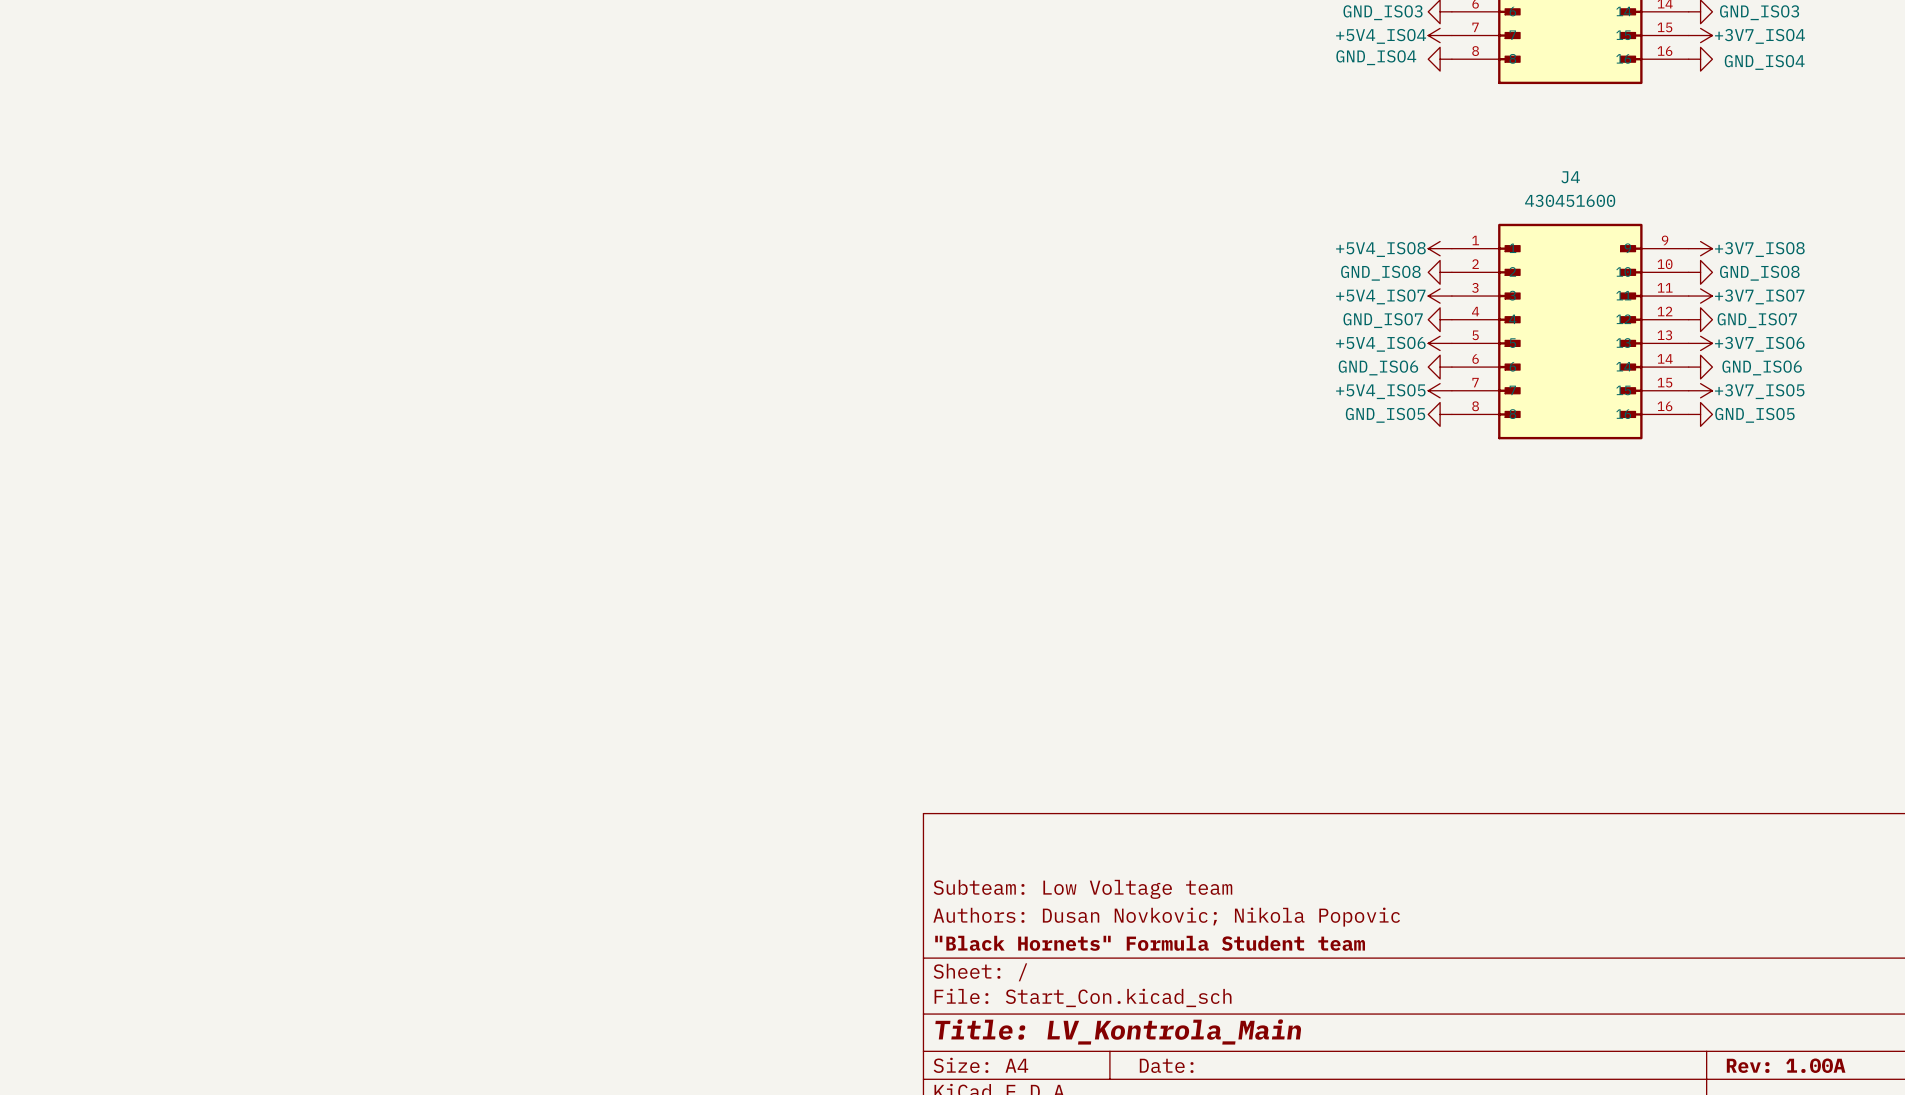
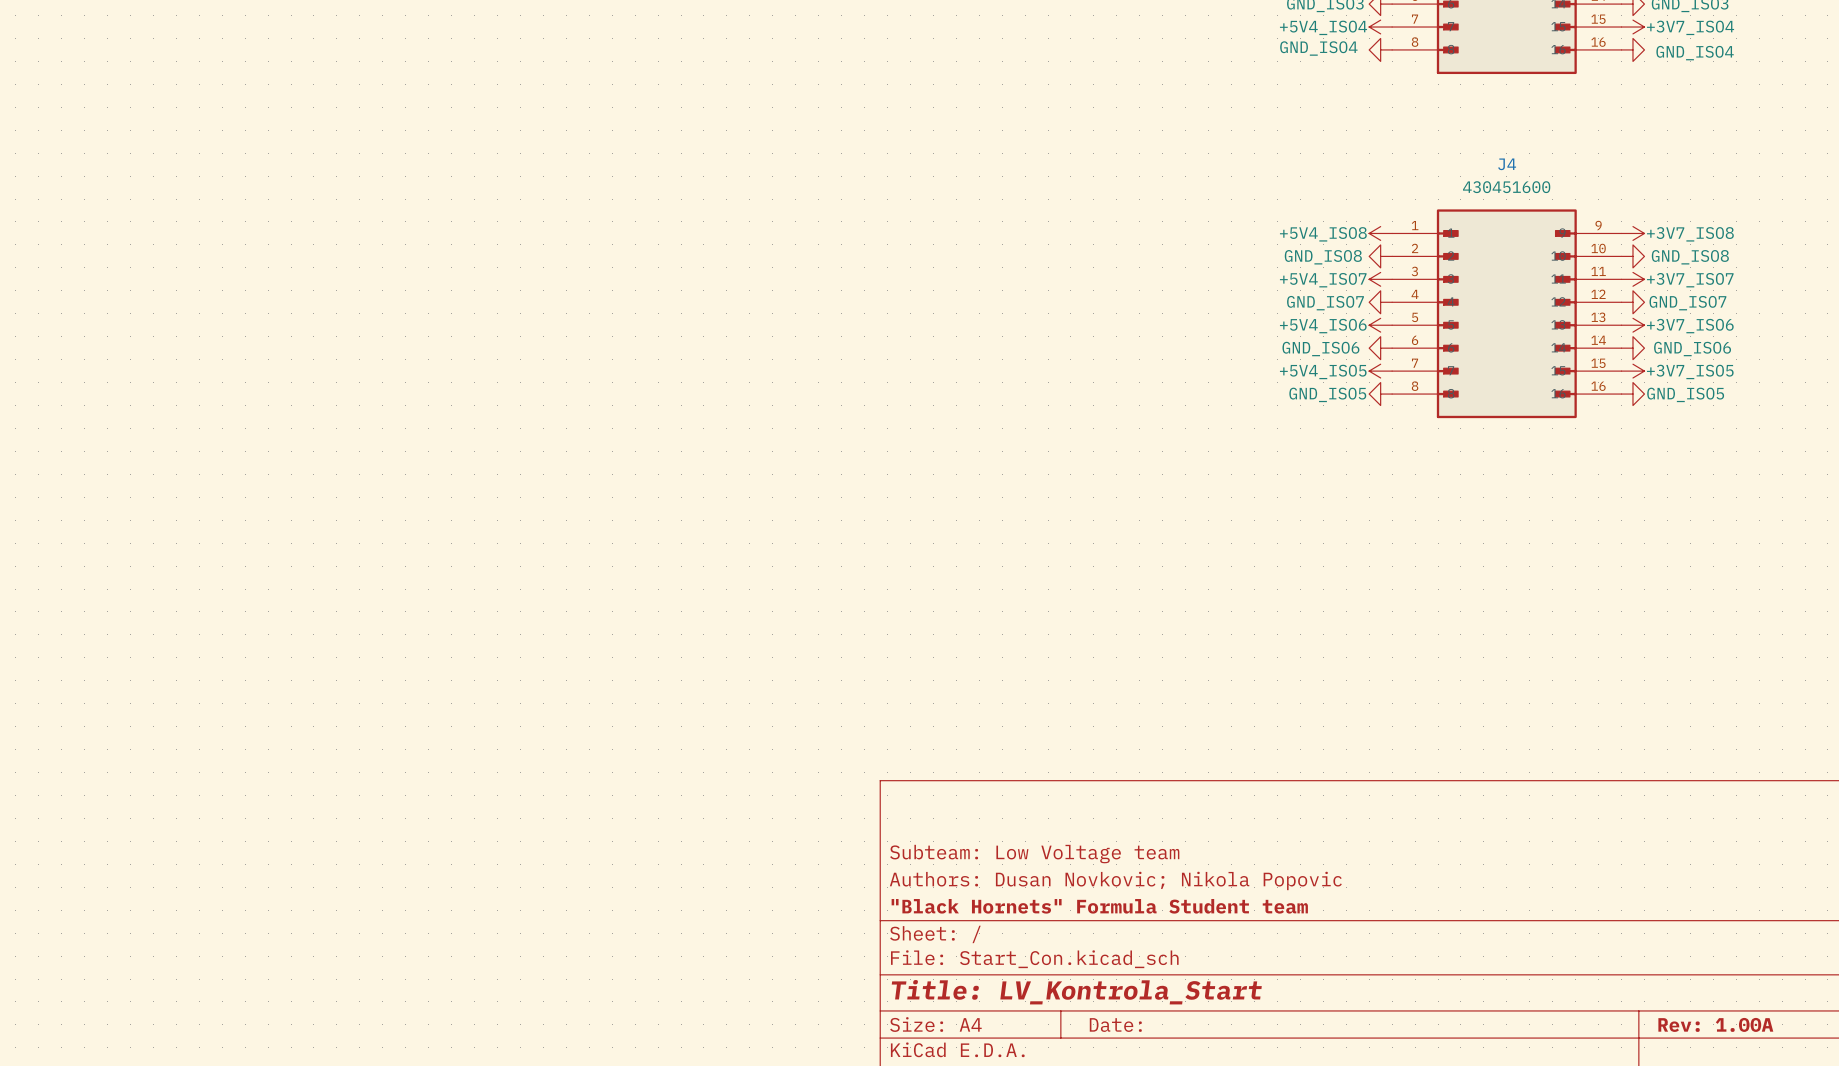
title block: Title: LV_Kontrola_Main (1118, 1031) -> Title: LV_Kontrola_Start (1076, 992)

